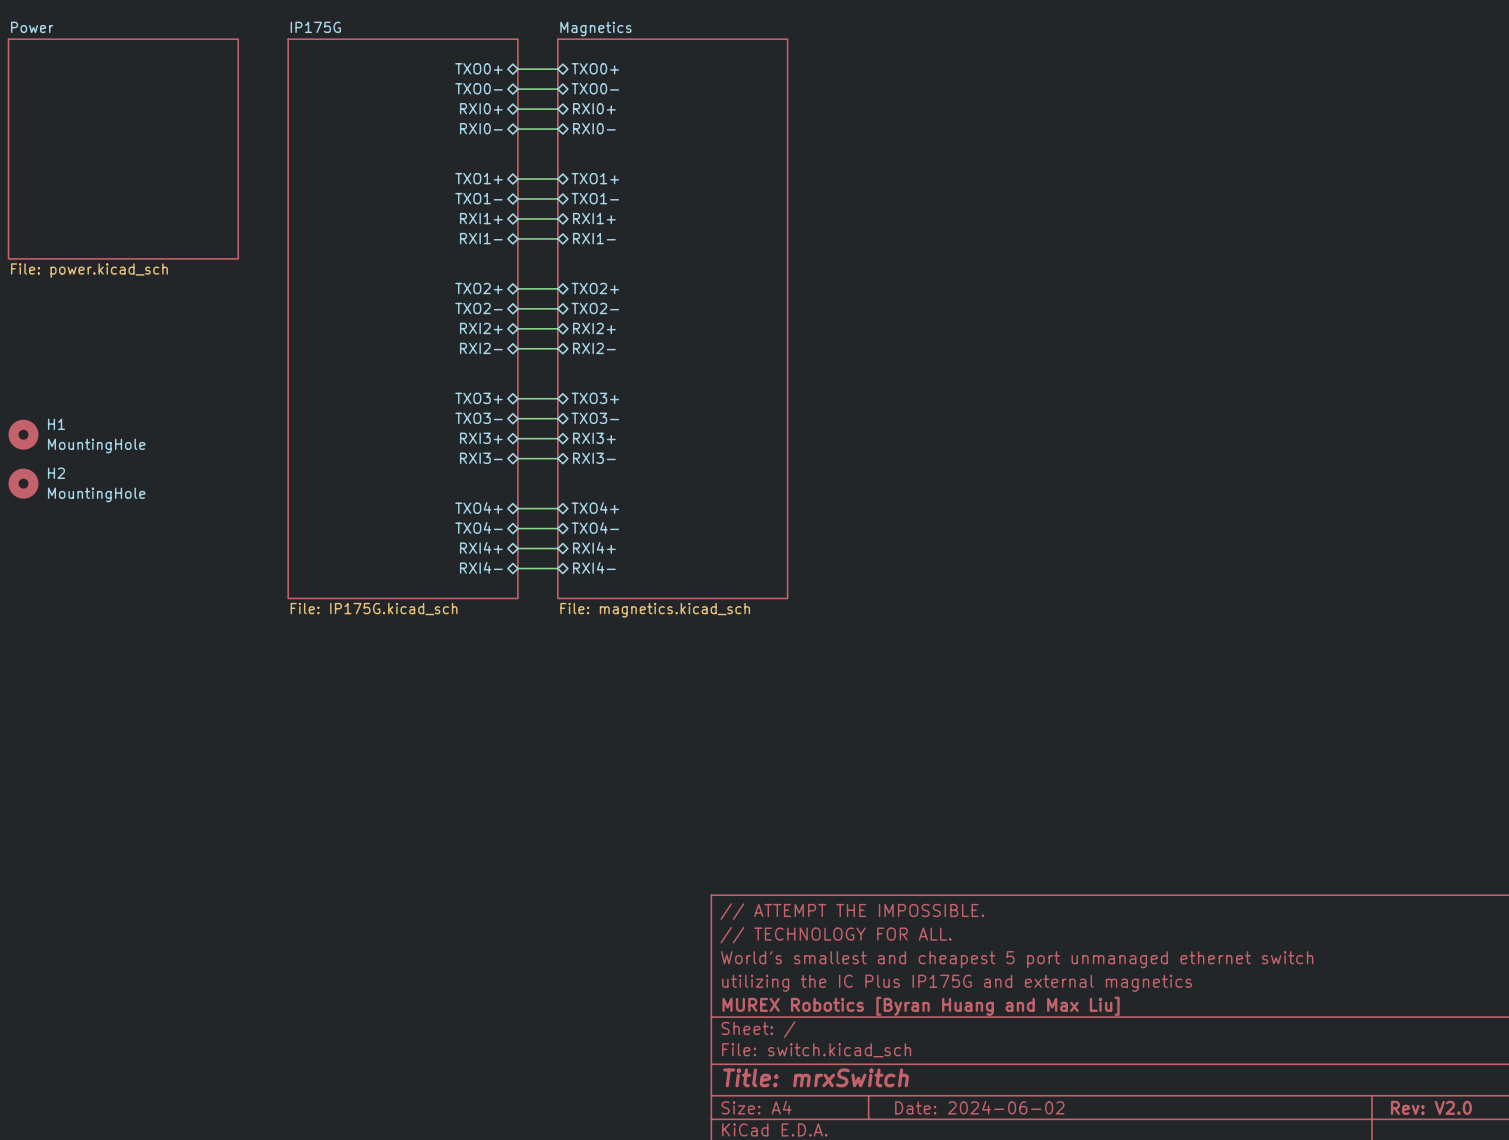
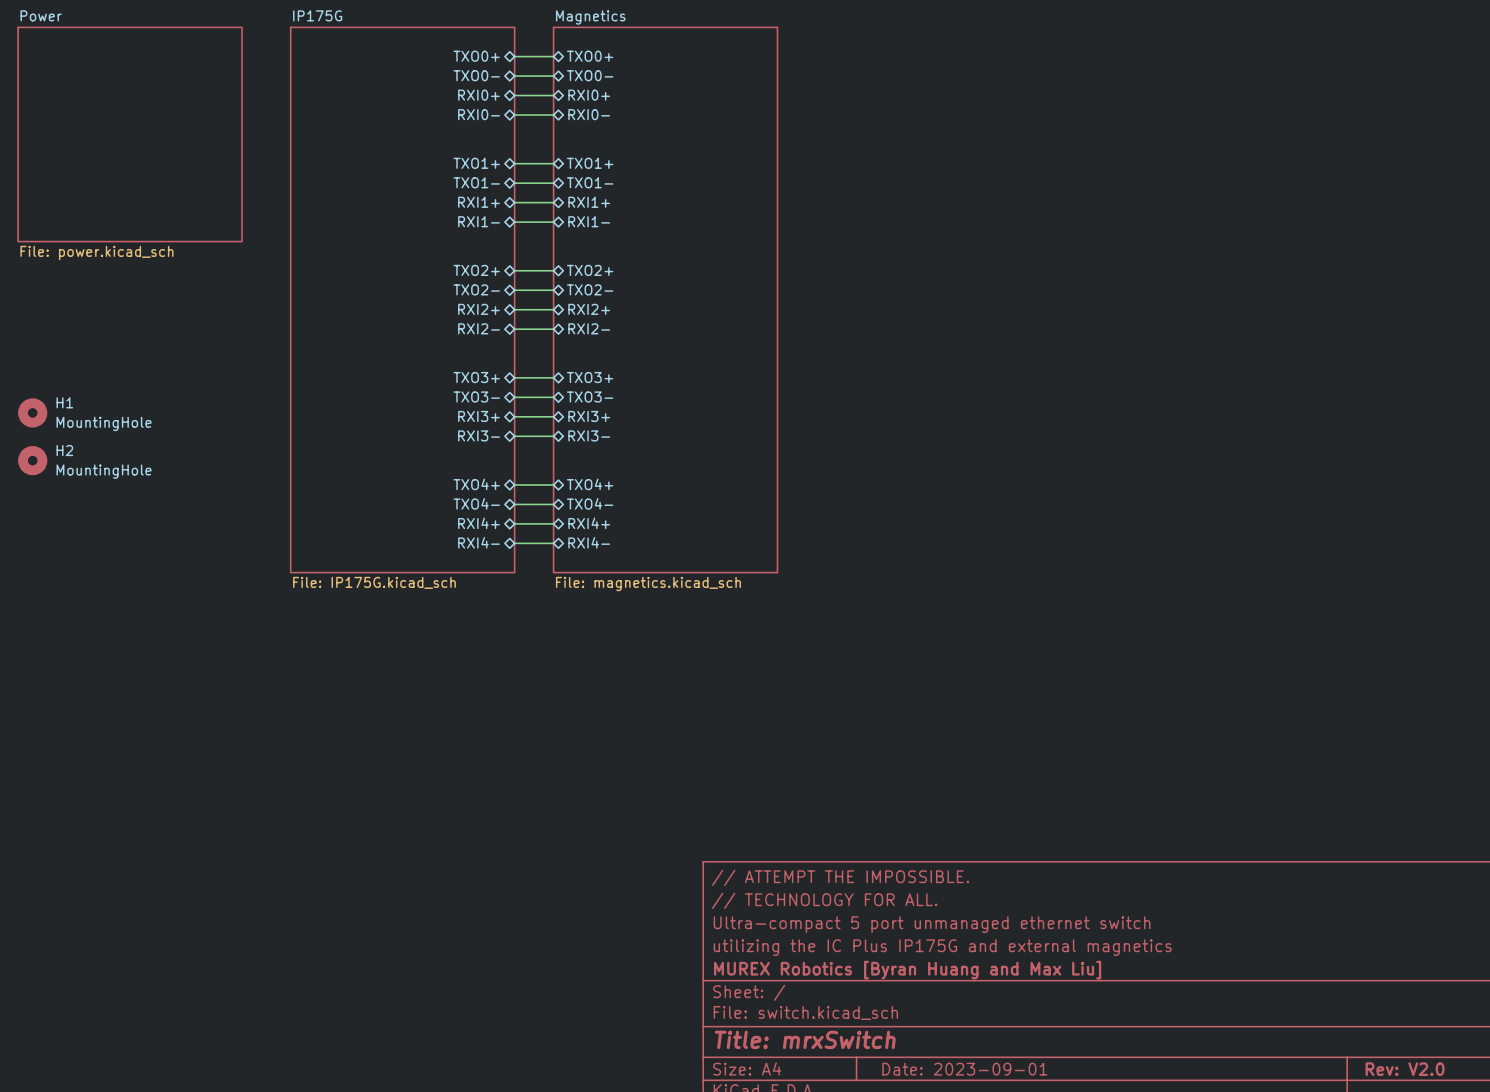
title block: World's smallest and cheapest 5 port unmanaged ethernet switch (1017, 959) -> Ultra-compact 5 port unmanaged ethernet switch (932, 924)
title block: Date: 2024-06-02 (979, 1107) -> Date: 2023-09-01 (964, 1069)

